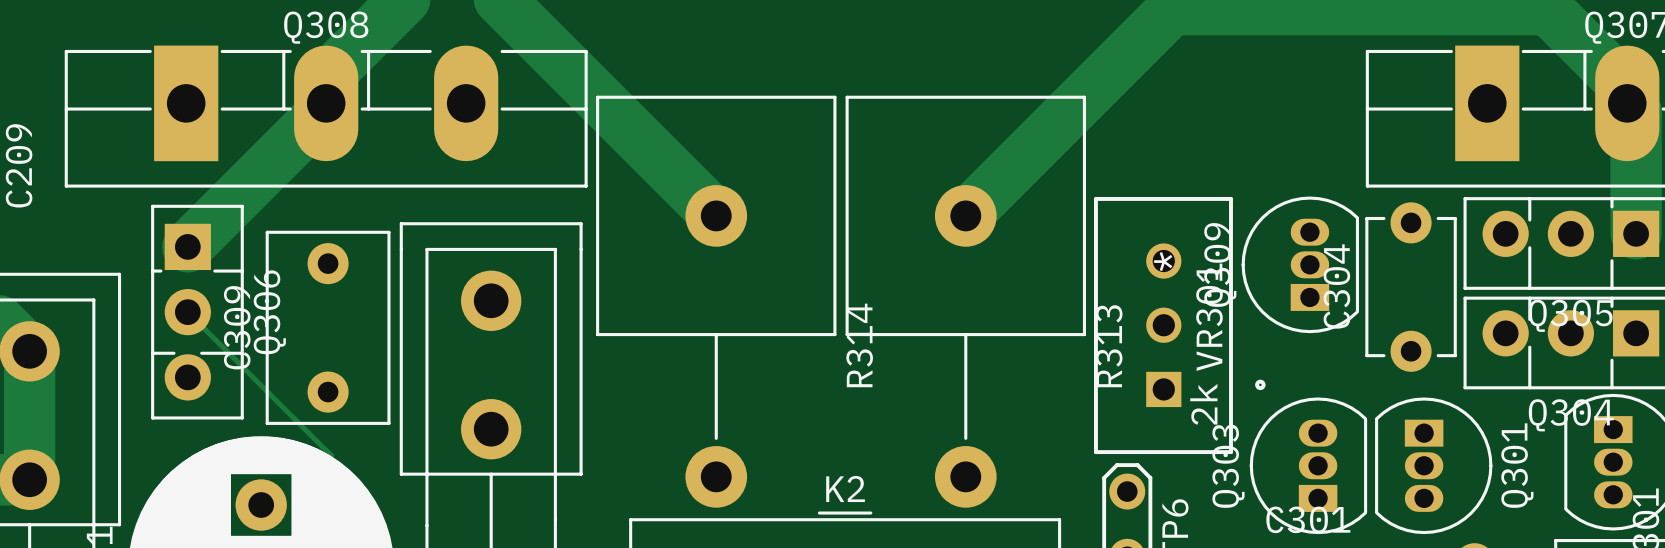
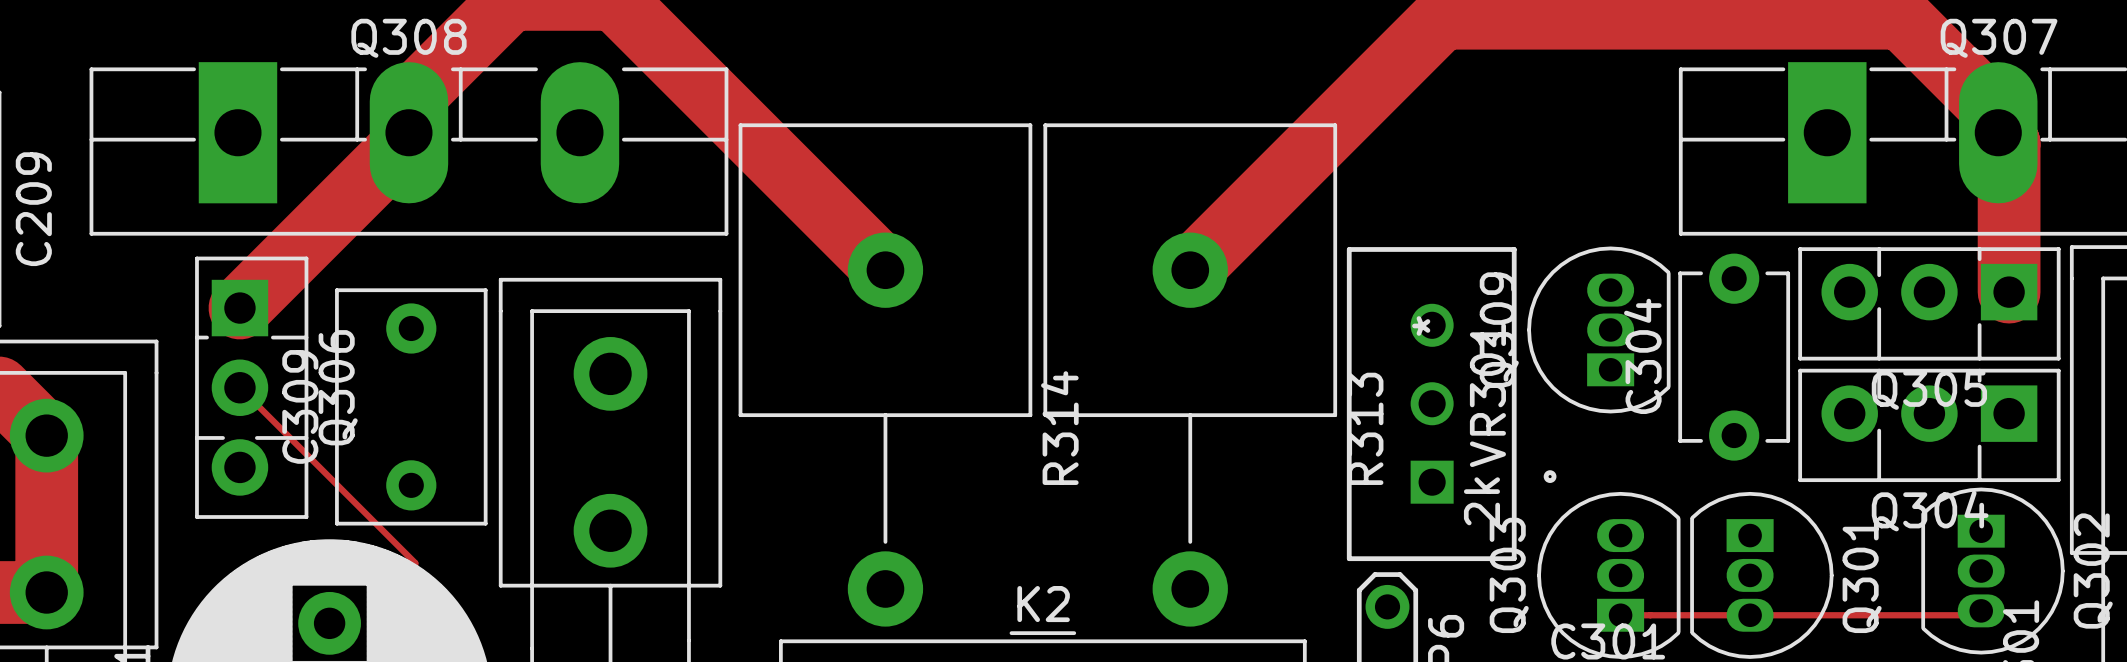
track: none -> (1981, 610) (1976, 615) (1620, 615)

